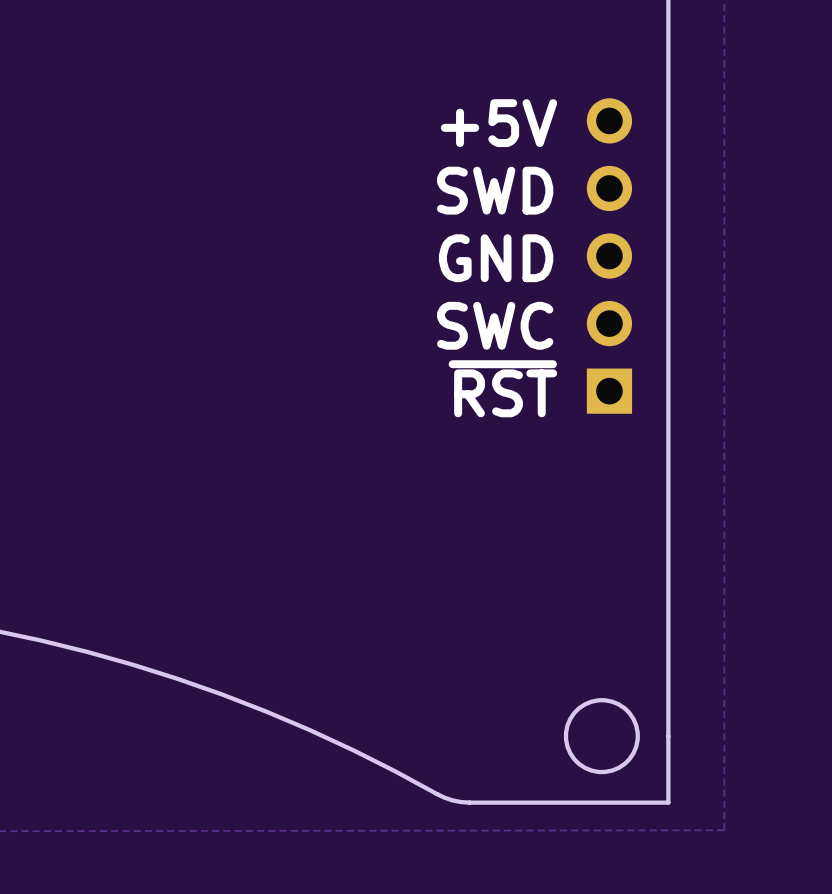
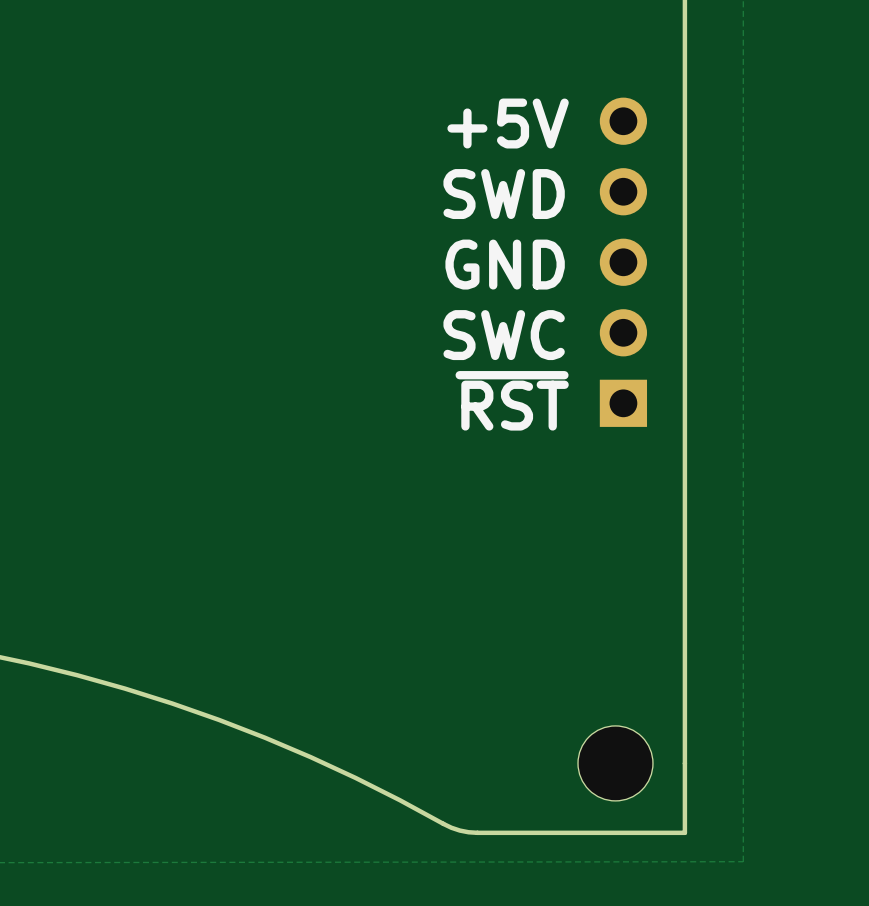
round board edge: [563, 698, 640, 775] -> none
part: none -> (615, 763)

